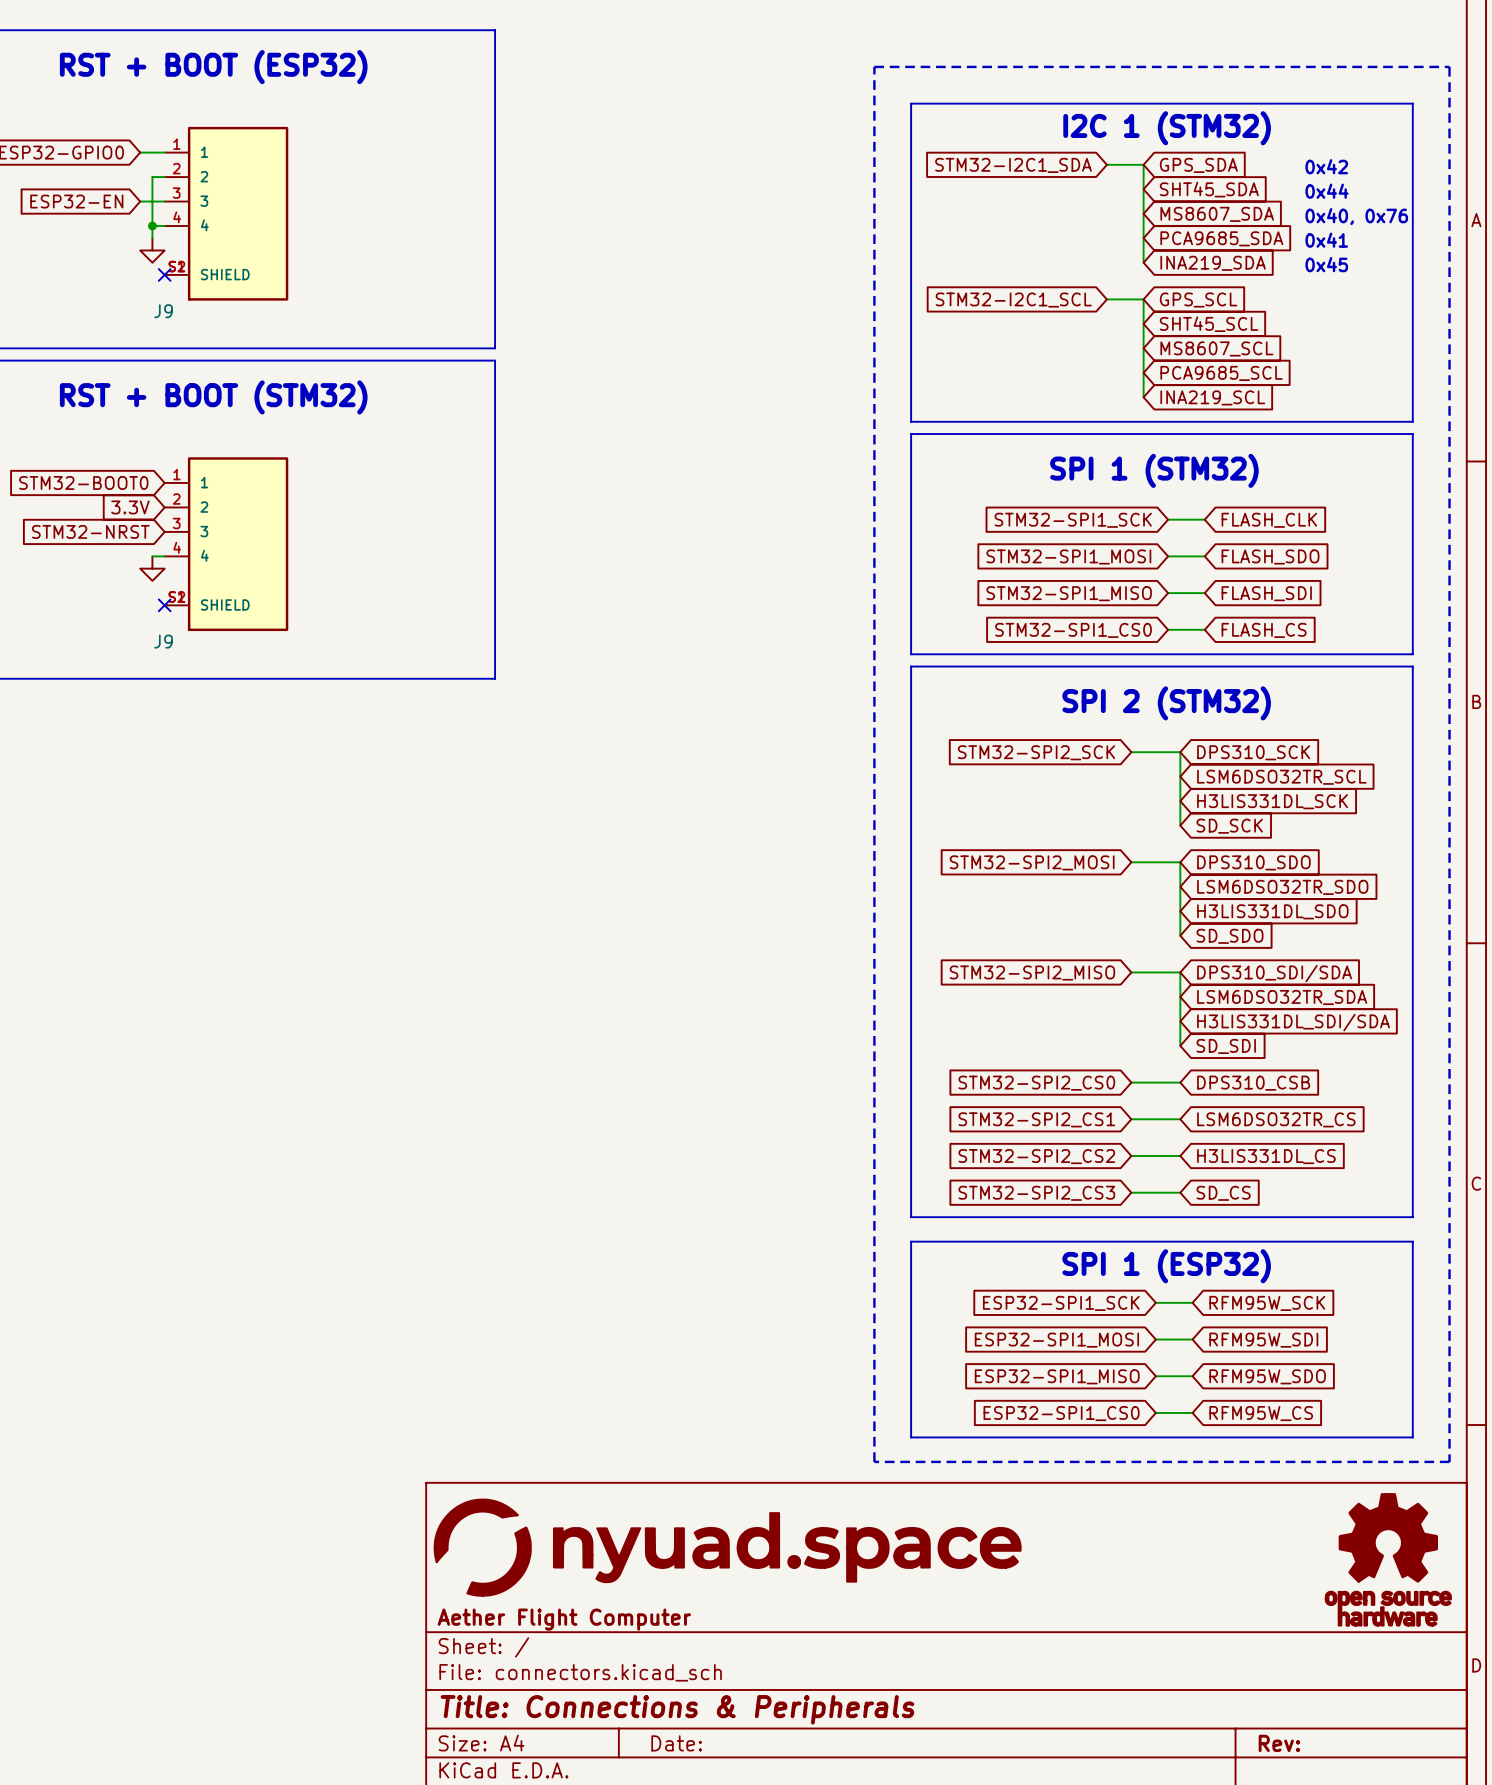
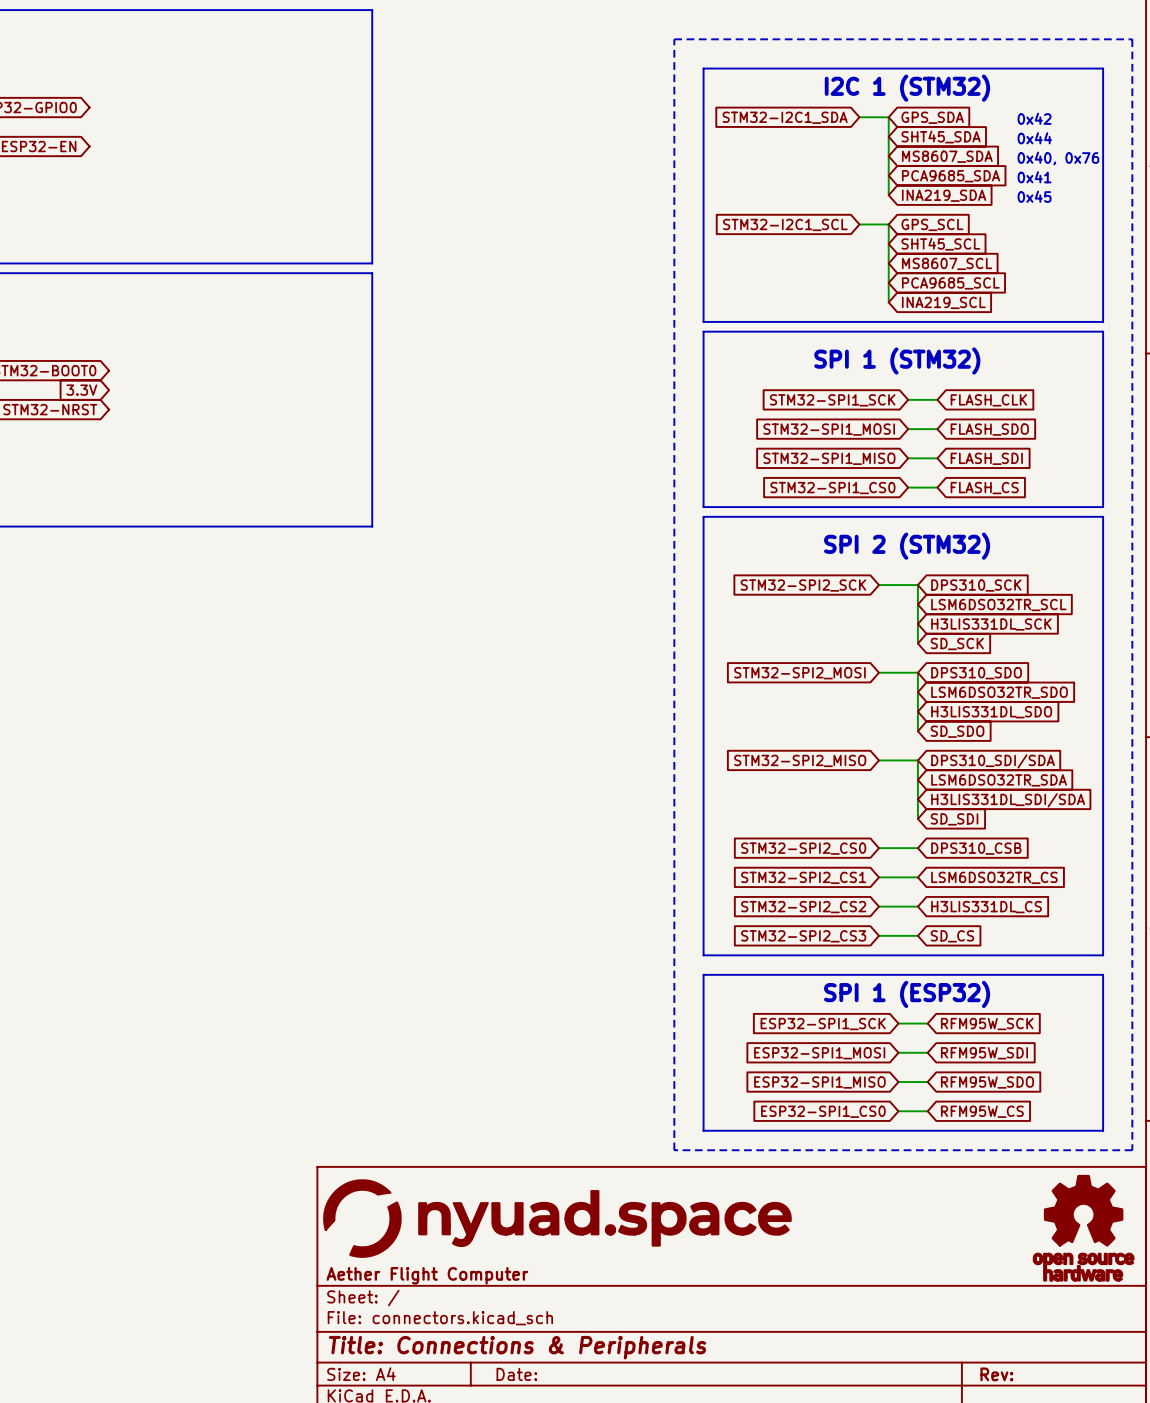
text: RST + BOOT (ESP32) (213, 67) -> none
wire: (140, 152) (164, 152) -> none
wire: (164, 177) (152, 177) (152, 238) -> none
wire: (140, 201) (164, 201) -> none
J9: (226, 213) -> none
wire: (152, 226) (164, 226) -> none
junction: (152, 226) -> none
power symbol: (152, 250) -> none
no-connect mark: (164, 274) -> none
text: RST + BOOT (STM32) (213, 397) -> none
J9: (226, 544) -> none
wire: (152, 556) (164, 556) -> none
power symbol: (152, 568) -> none
no-connect mark: (164, 605) -> none

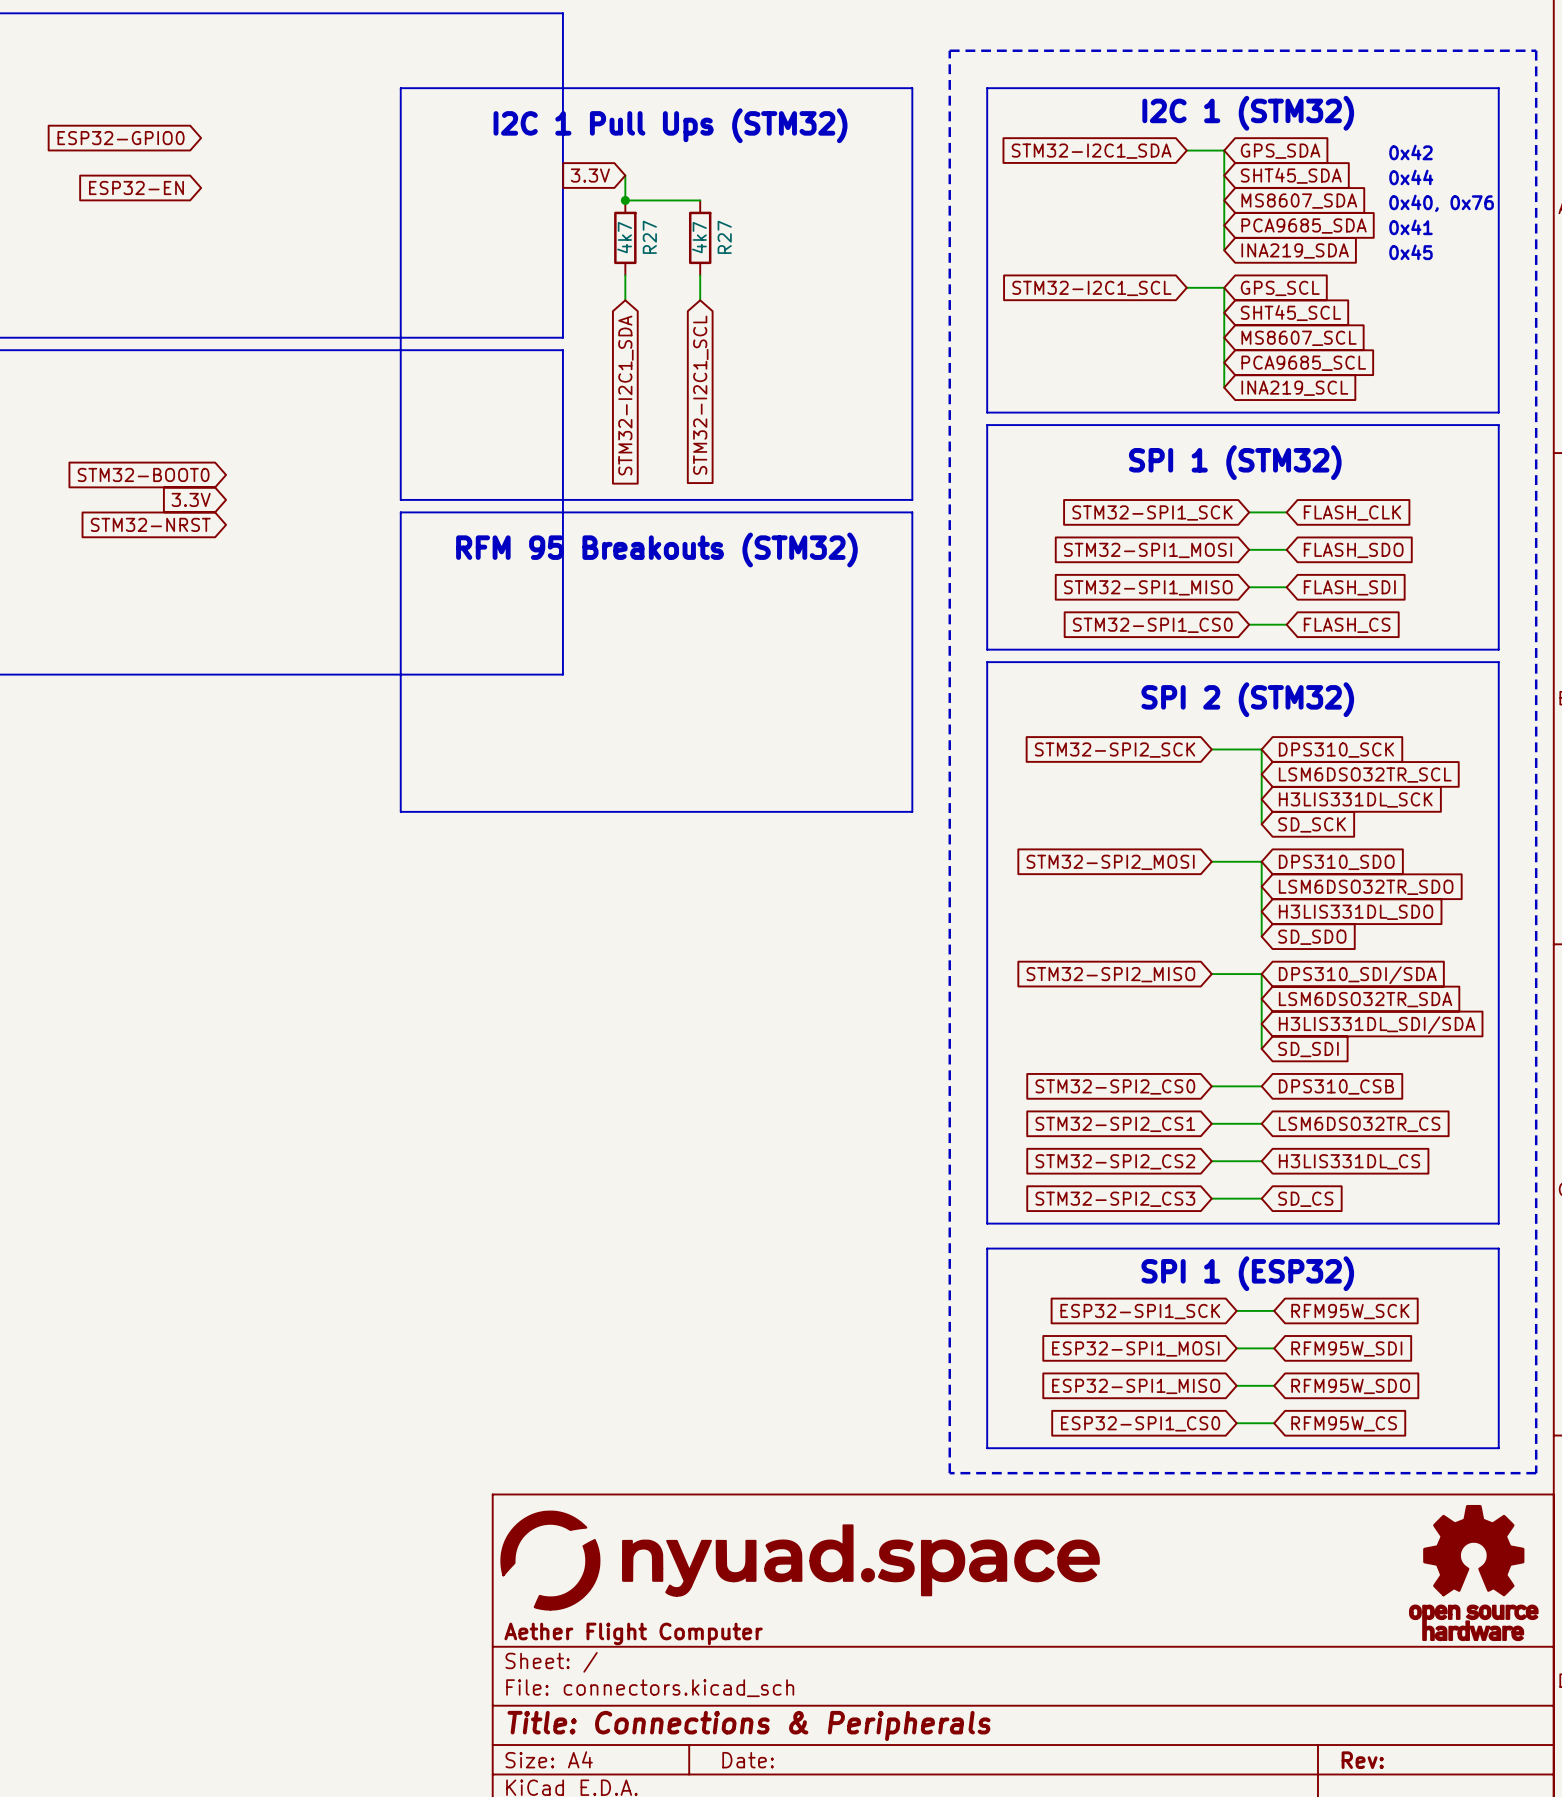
line: none -> (400, 88) (912, 88) (912, 499) (400, 499) (400, 88)
text: none -> I2C 1 Pull Ups (STM32) (670, 125)
global label: none -> 3.3V (590, 175)
wire: none -> (625, 175) (625, 200) (700, 200)
junction: none -> (625, 200)
R27: none -> 4k7 (625, 237)
R27: none -> 4k7 (700, 237)
wire: none -> (625, 275) (625, 300)
wire: none -> (700, 275) (700, 300)
global label: none -> STM32-I2C1_SDA (625, 395)
global label: none -> STM32-I2C1_SCL (700, 395)
line: none -> (400, 512) (912, 512) (912, 811) (400, 811) (400, 512)
text: none -> RFM 95 Breakouts (STM32) (656, 549)

